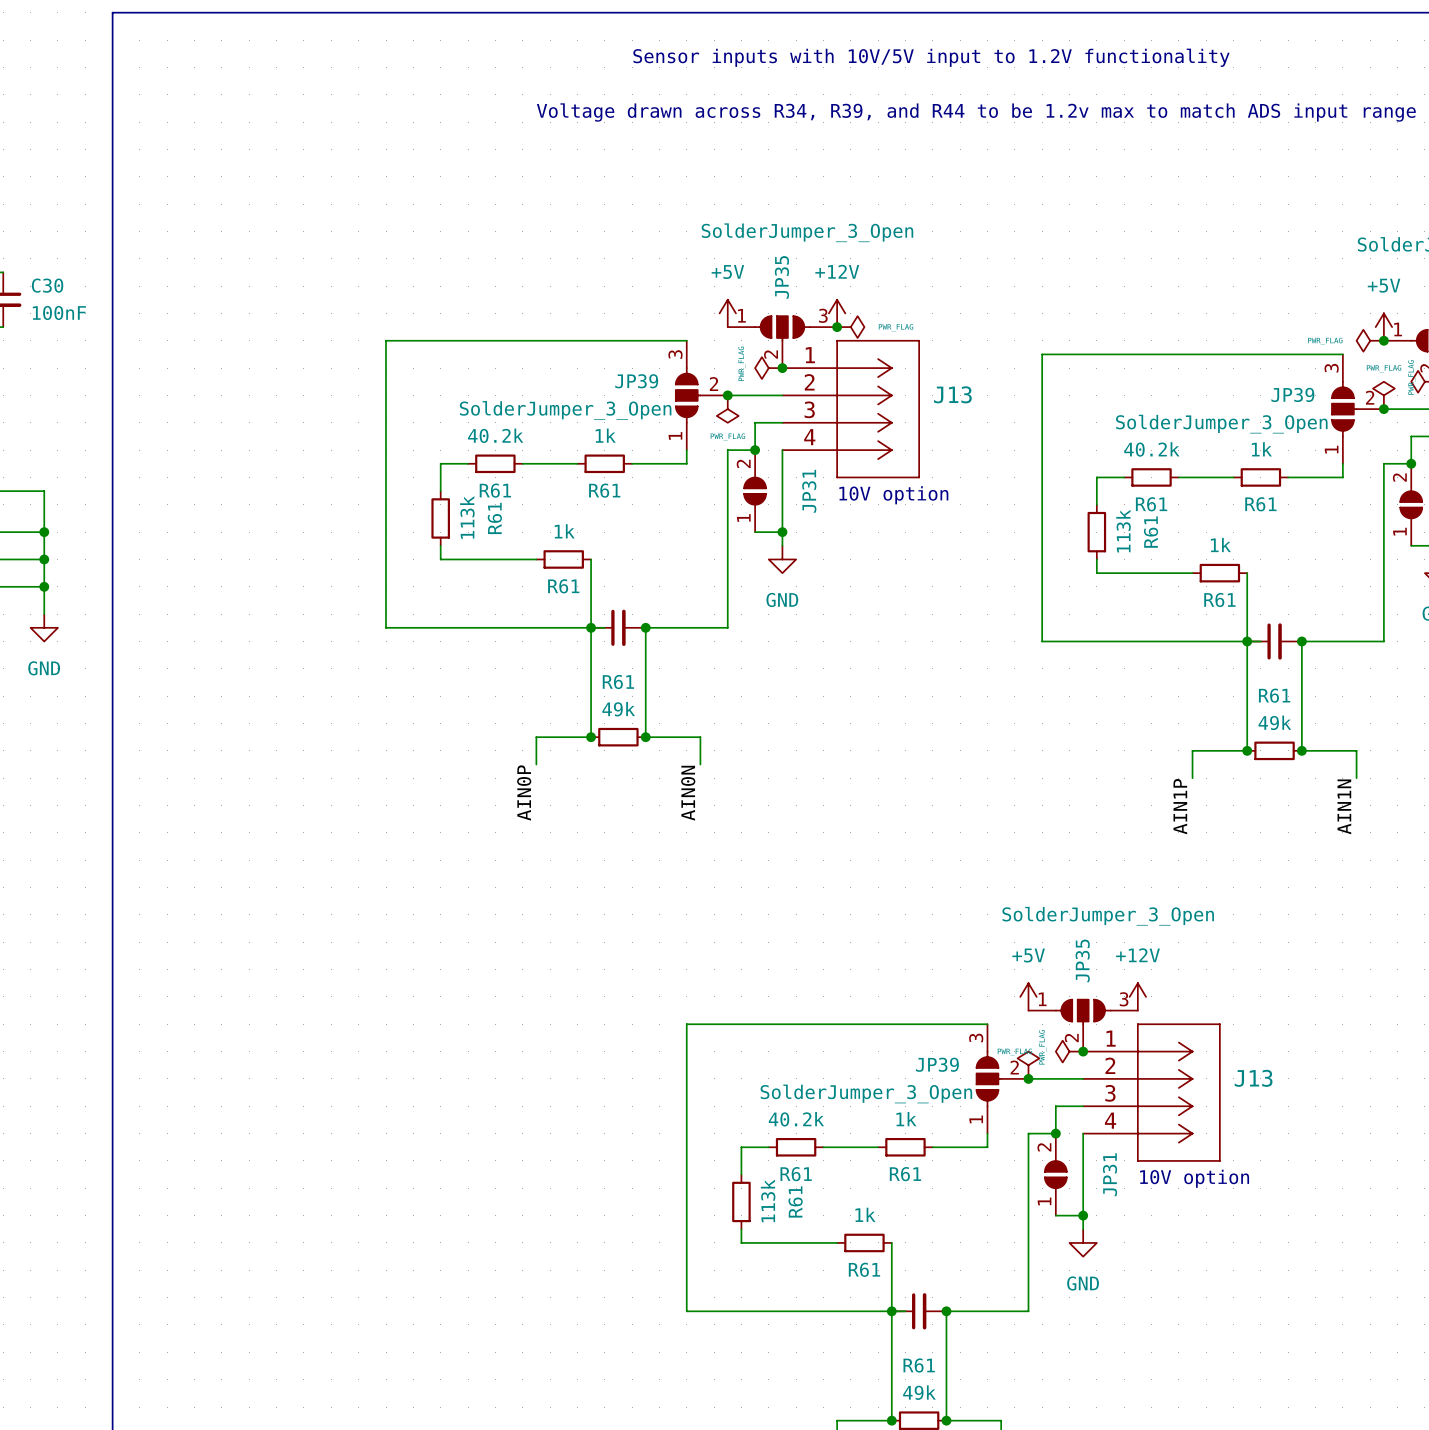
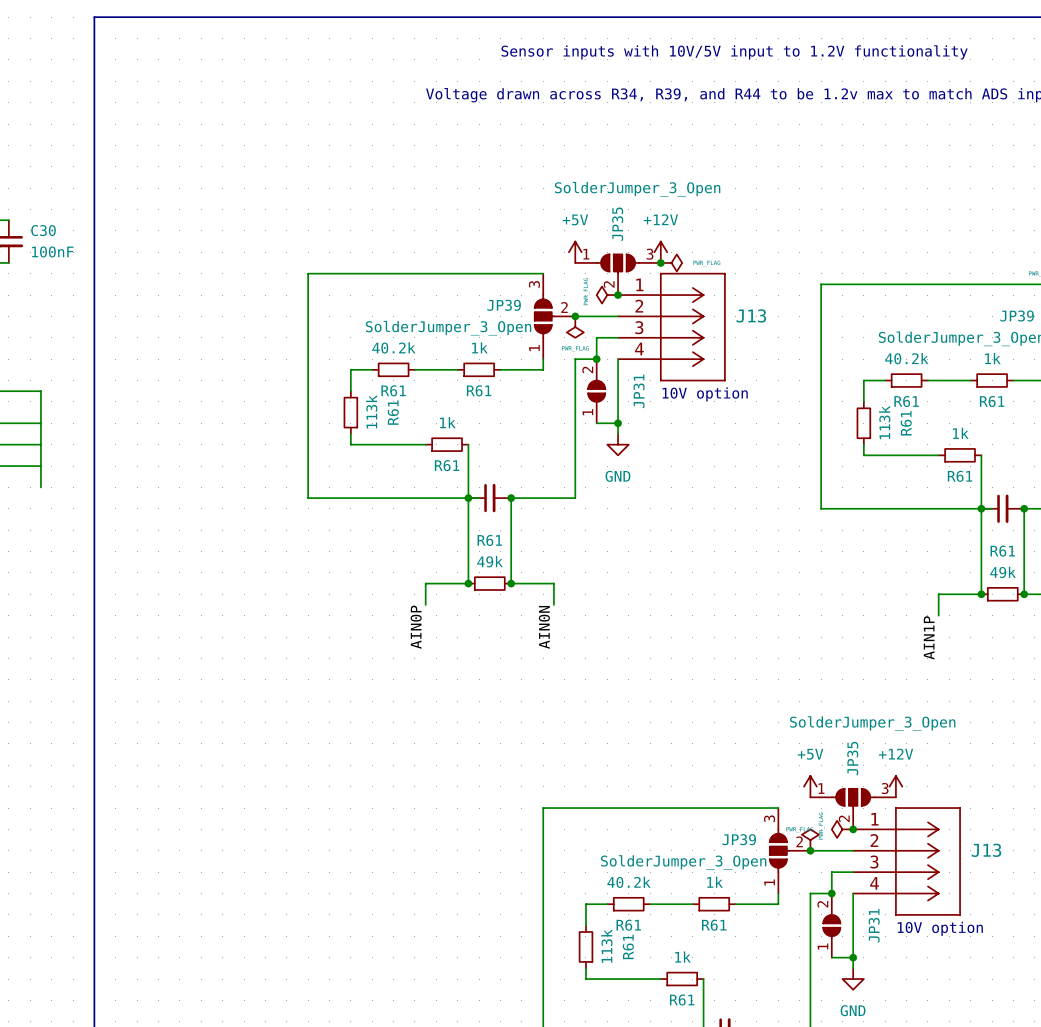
junction: (44, 532) -> none
junction: (44, 559) -> none
junction: (44, 586) -> none
power symbol: GND (44, 627) -> none

